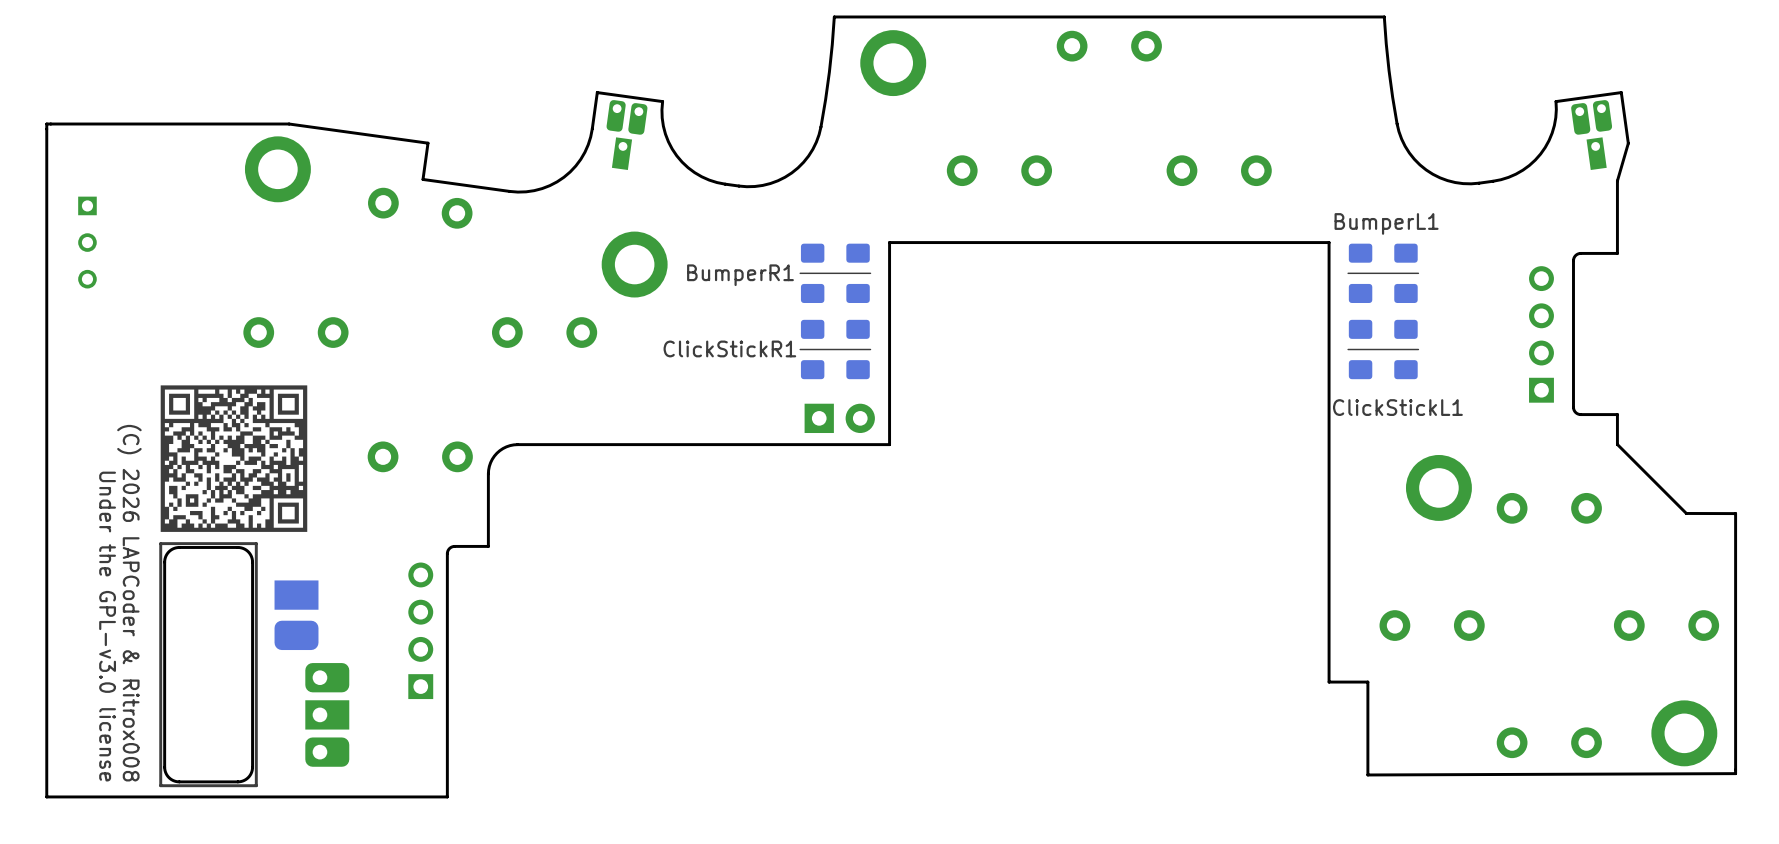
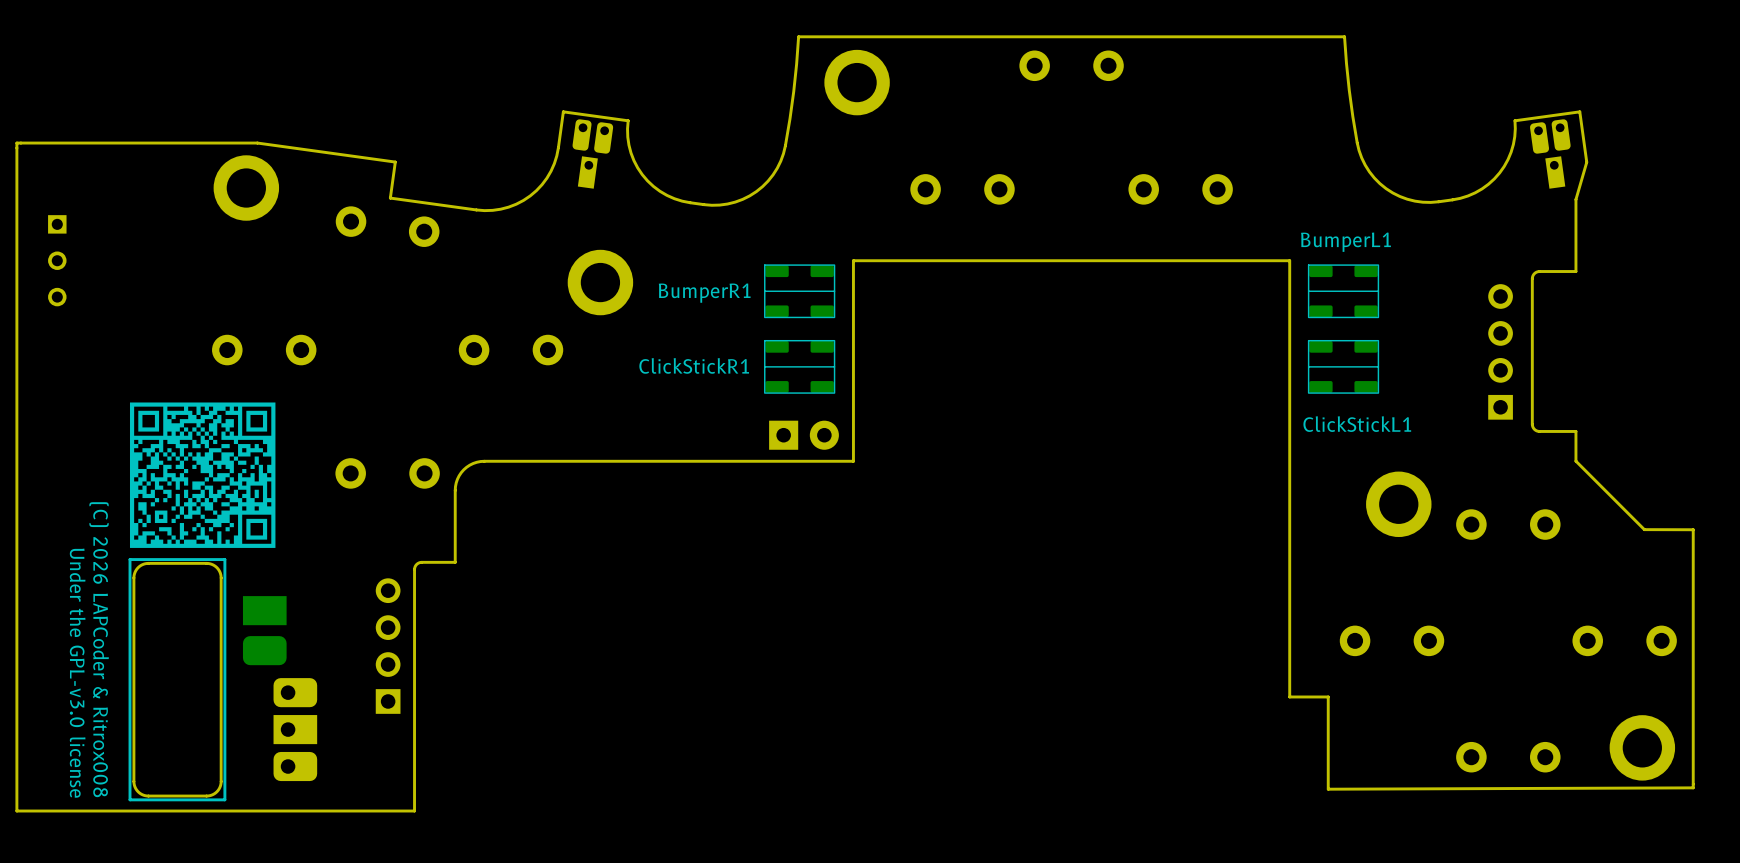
BumperR1 footprint: [799, 243, 872, 303] -> [764, 264, 836, 319]
BumperL1 footprint: [1347, 243, 1420, 303] -> [1307, 264, 1380, 319]
ClickStickR1 footprint: [799, 319, 872, 380] -> [764, 339, 836, 394]
ClickStickL1 footprint: [1347, 319, 1420, 380] -> [1307, 339, 1380, 394]

